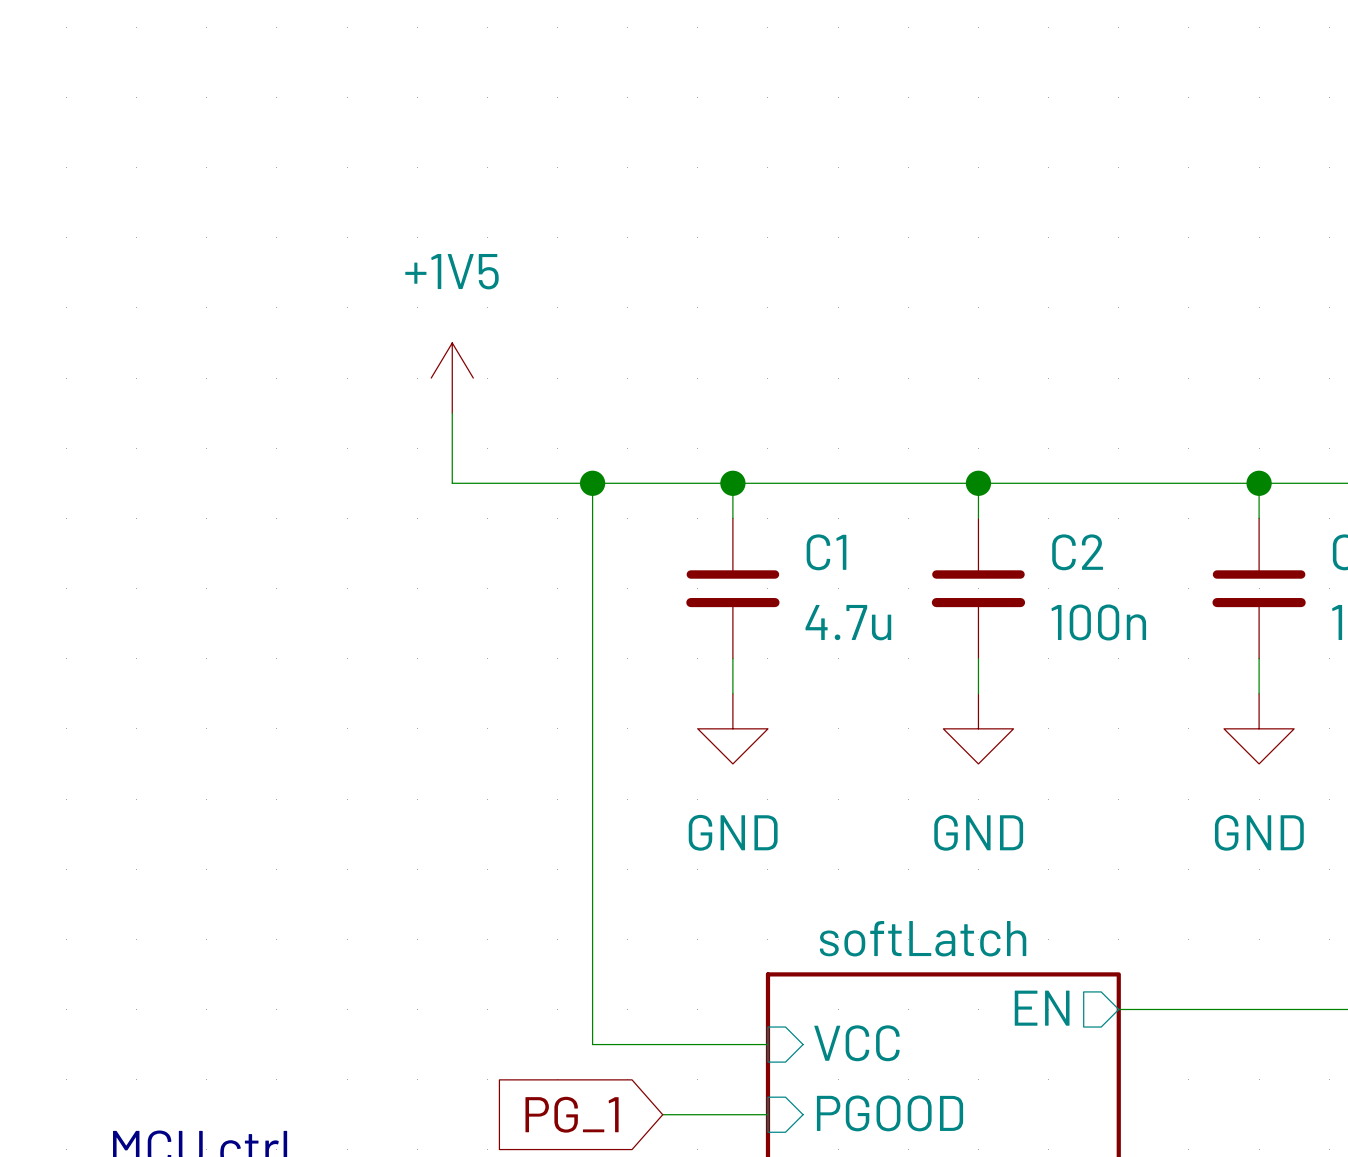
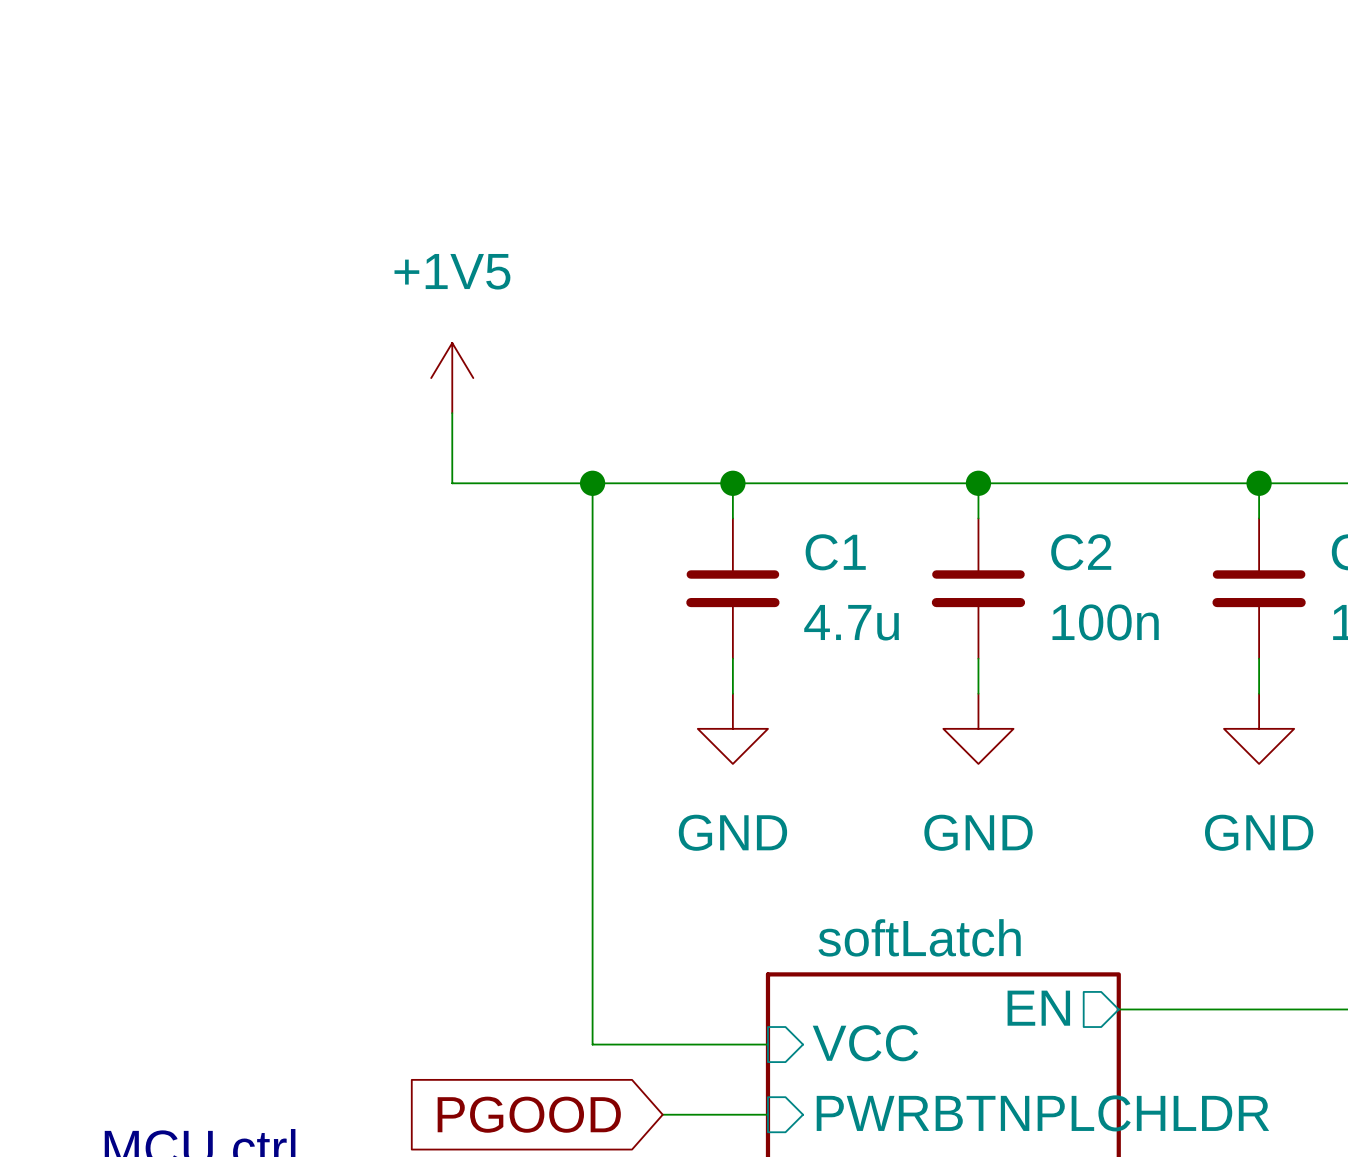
sheet pin: PGOOD (890, 1113) -> PWRBTNPLCHLDR (1042, 1113)
global label: PG_1 (572, 1114) -> PGOOD (529, 1114)

